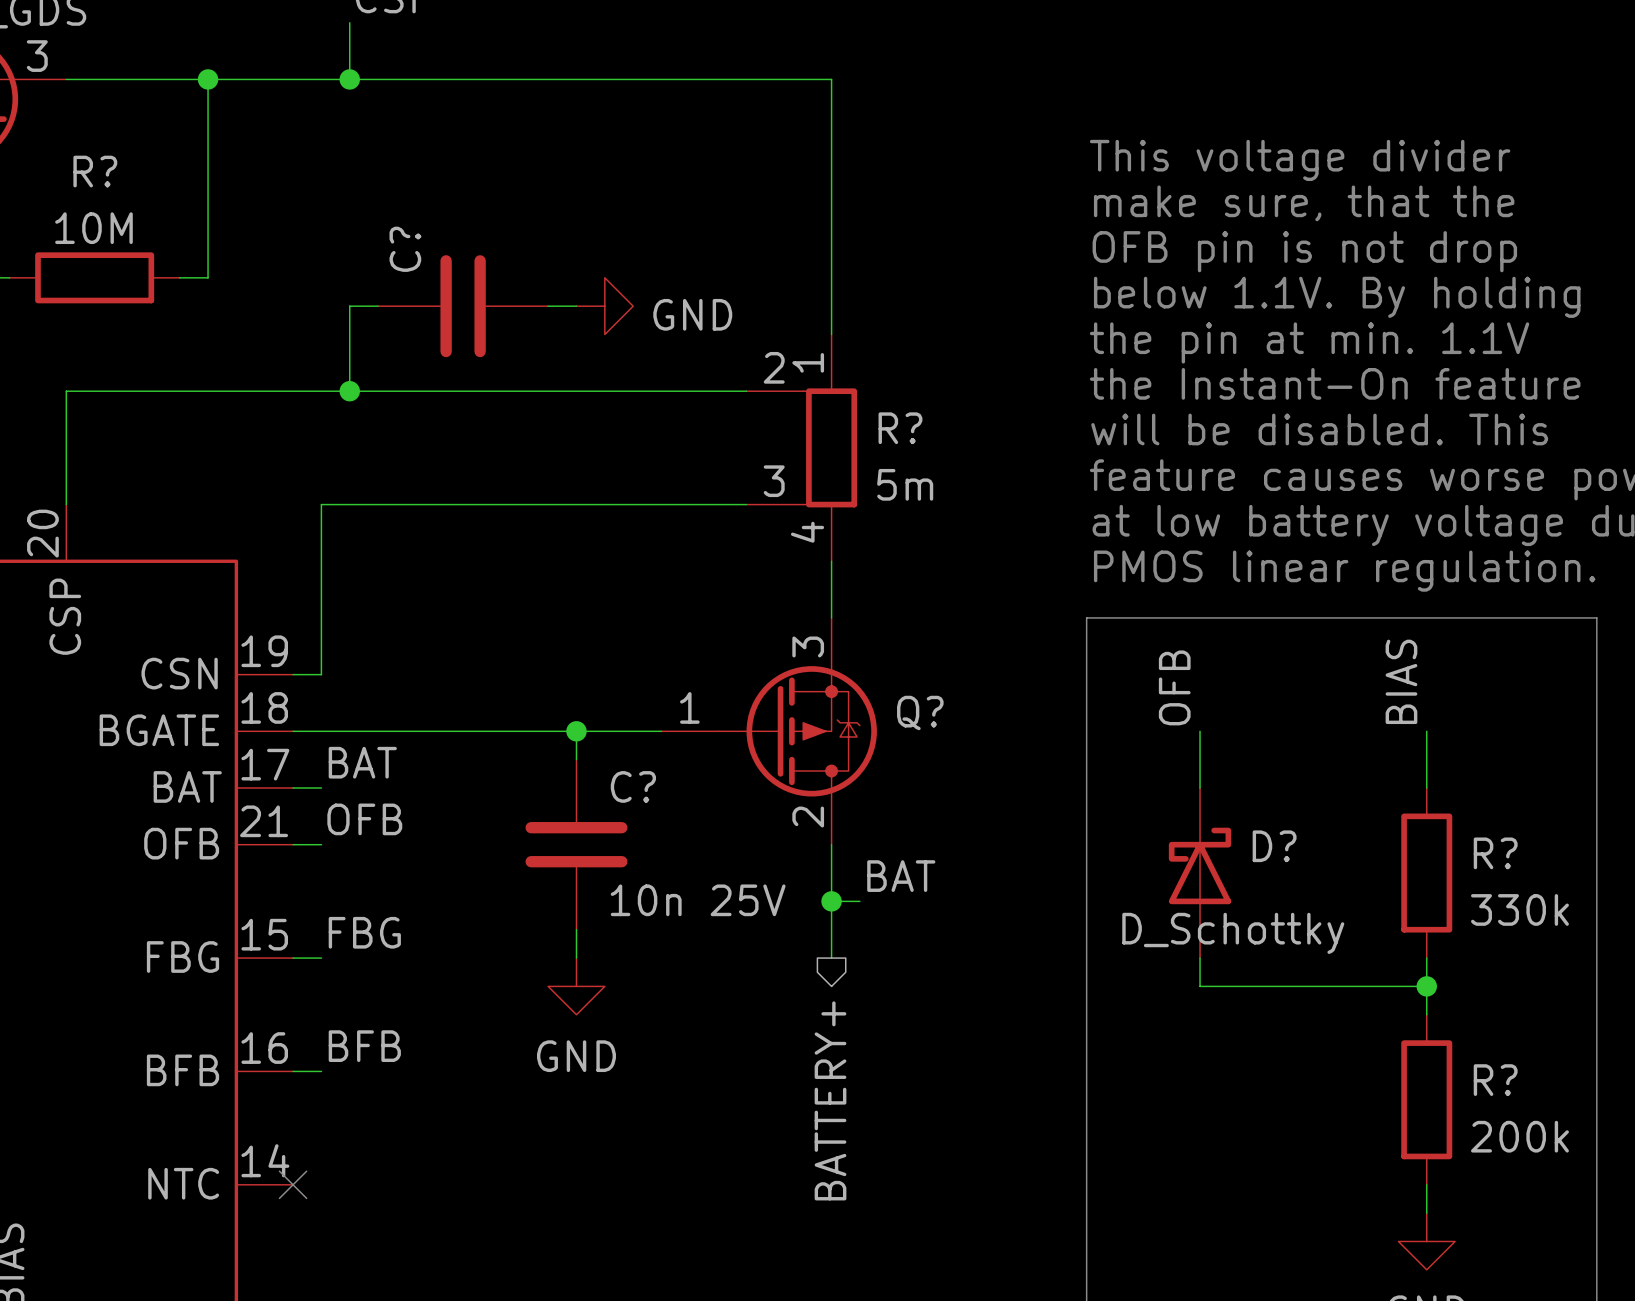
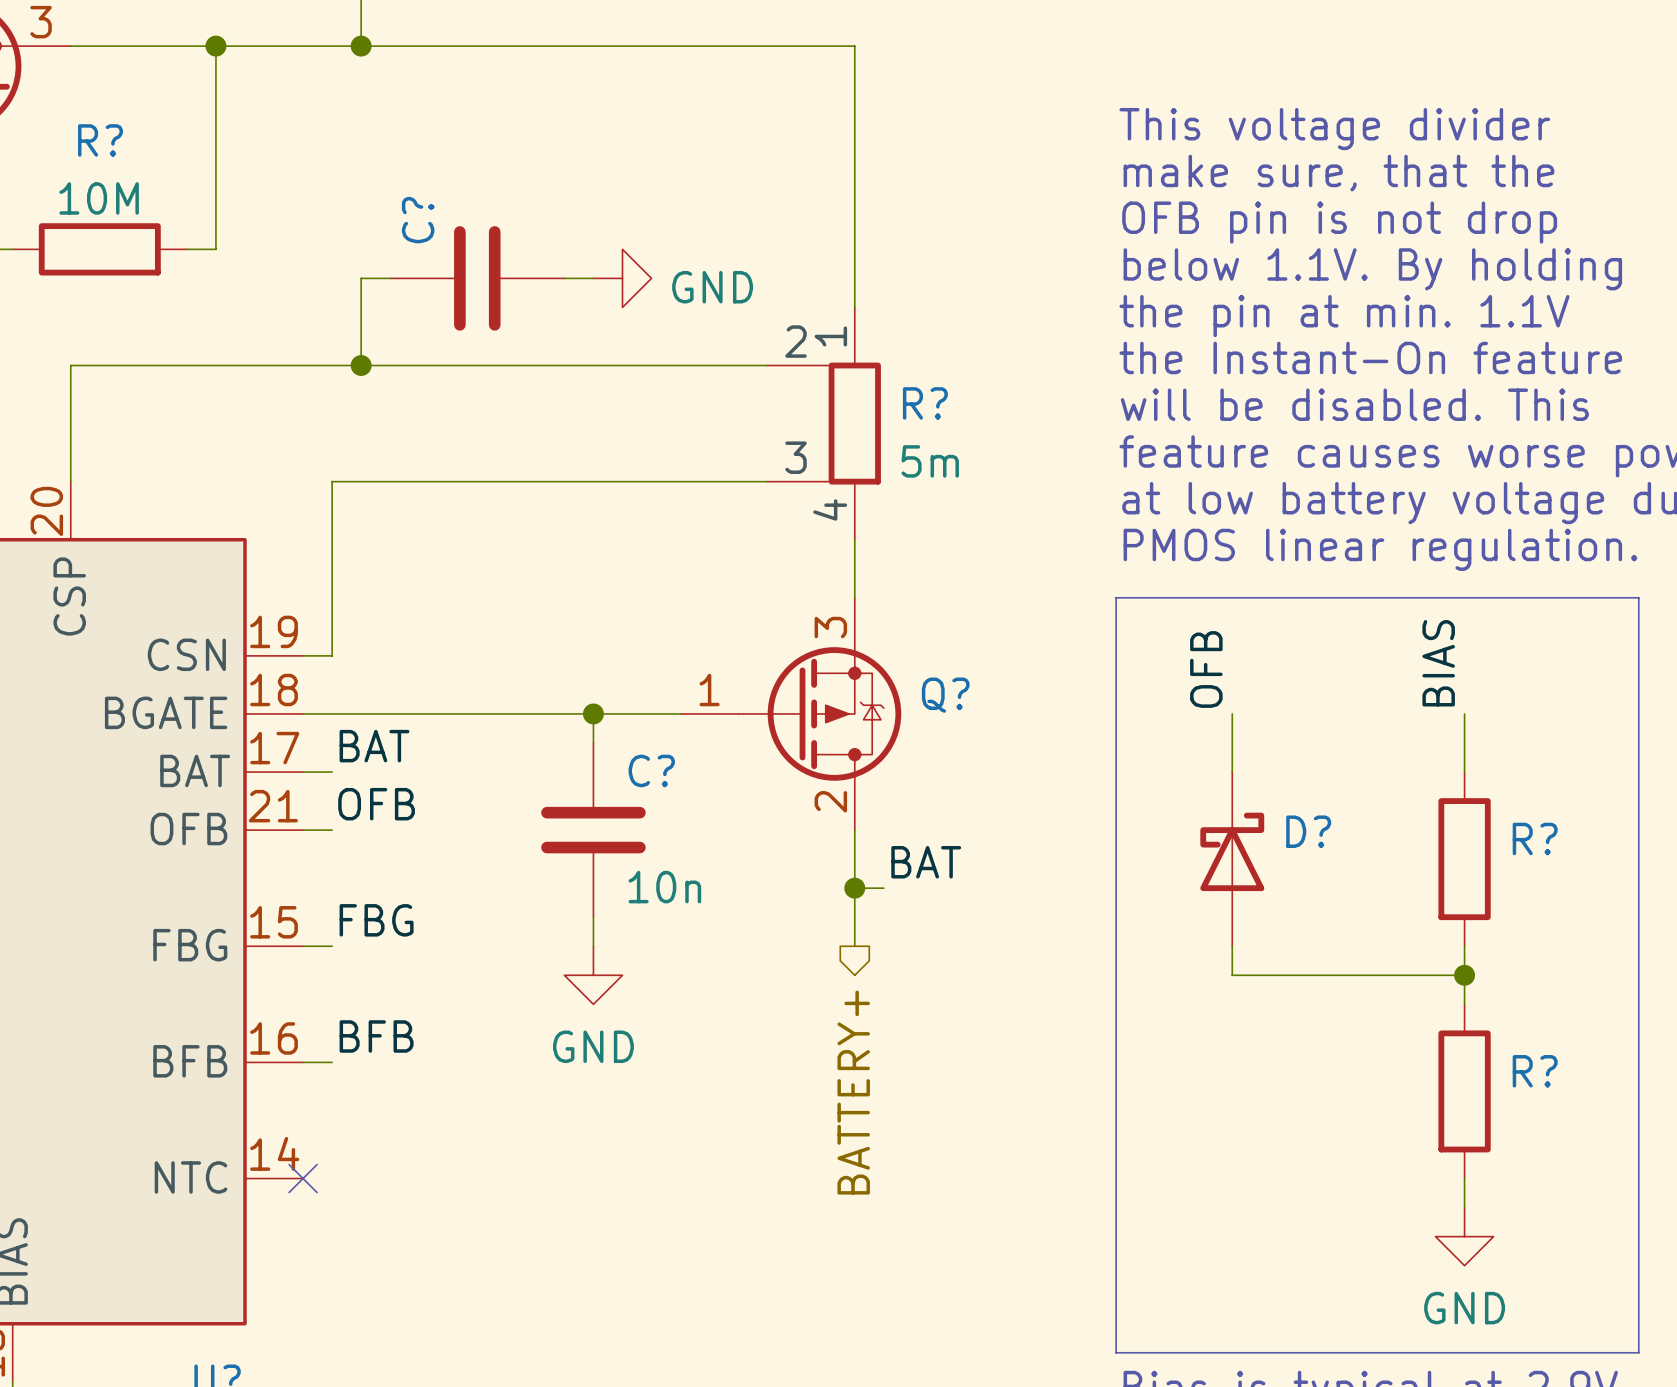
C? value: 10n 25V (698, 900) -> 10n (664, 887)
R? value: 330k (1519, 909) -> none
D? value: D_Schottky (1233, 933) -> none
R? value: 200k (1519, 1136) -> none

